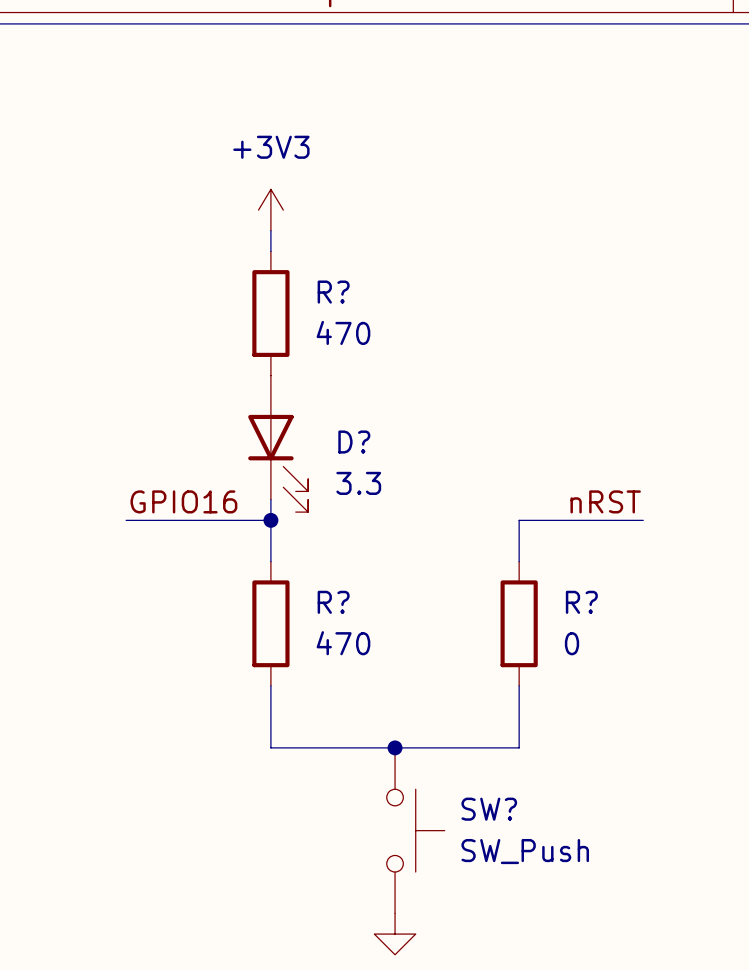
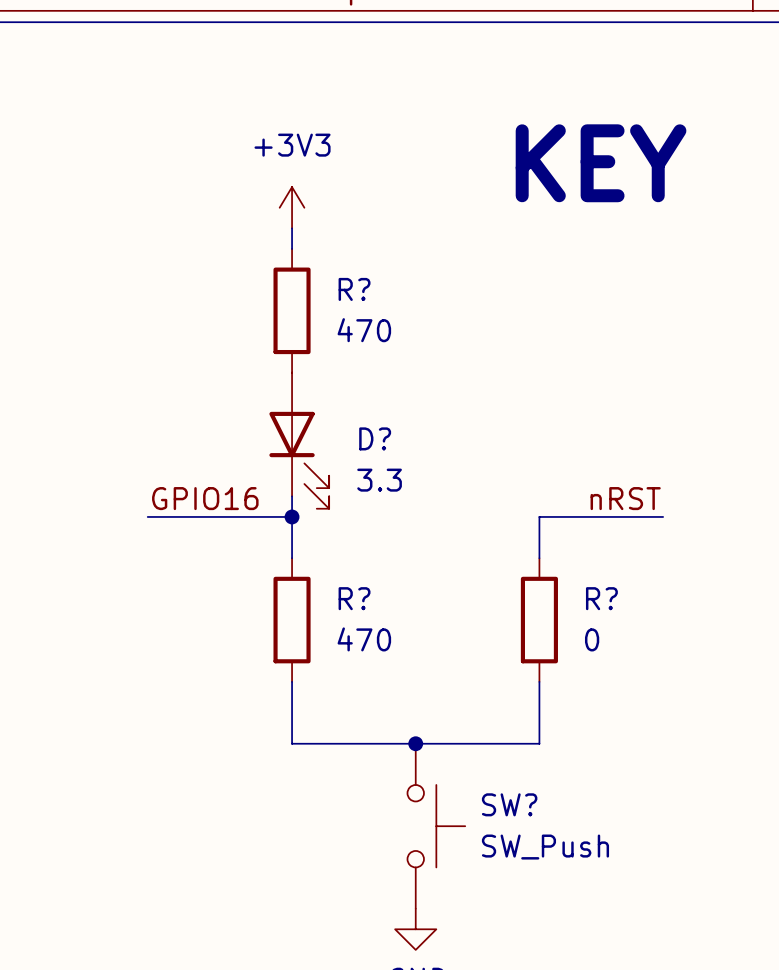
text: none -> KEY (601, 163)

